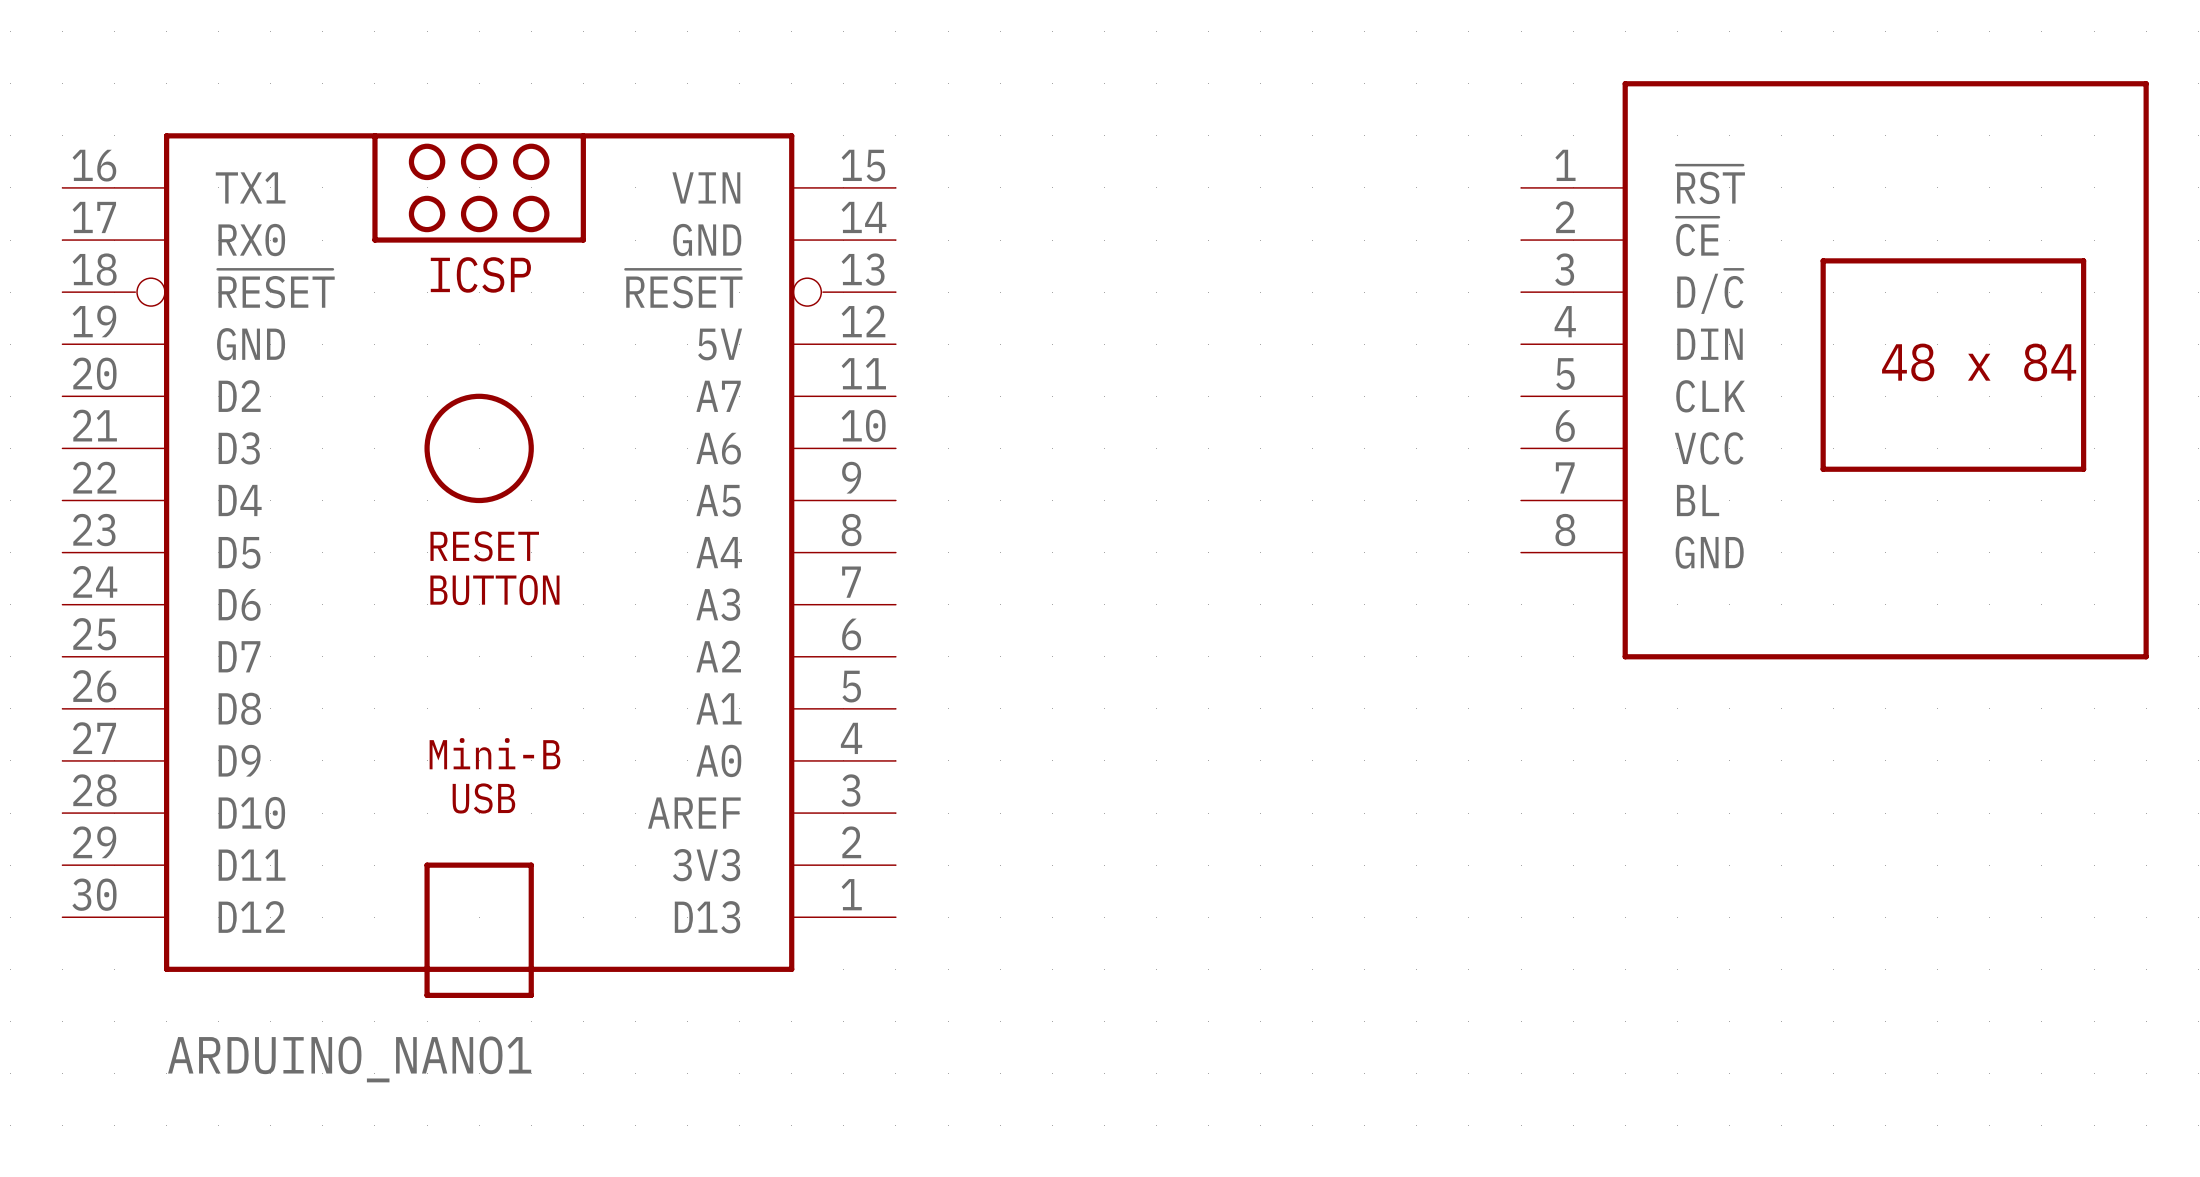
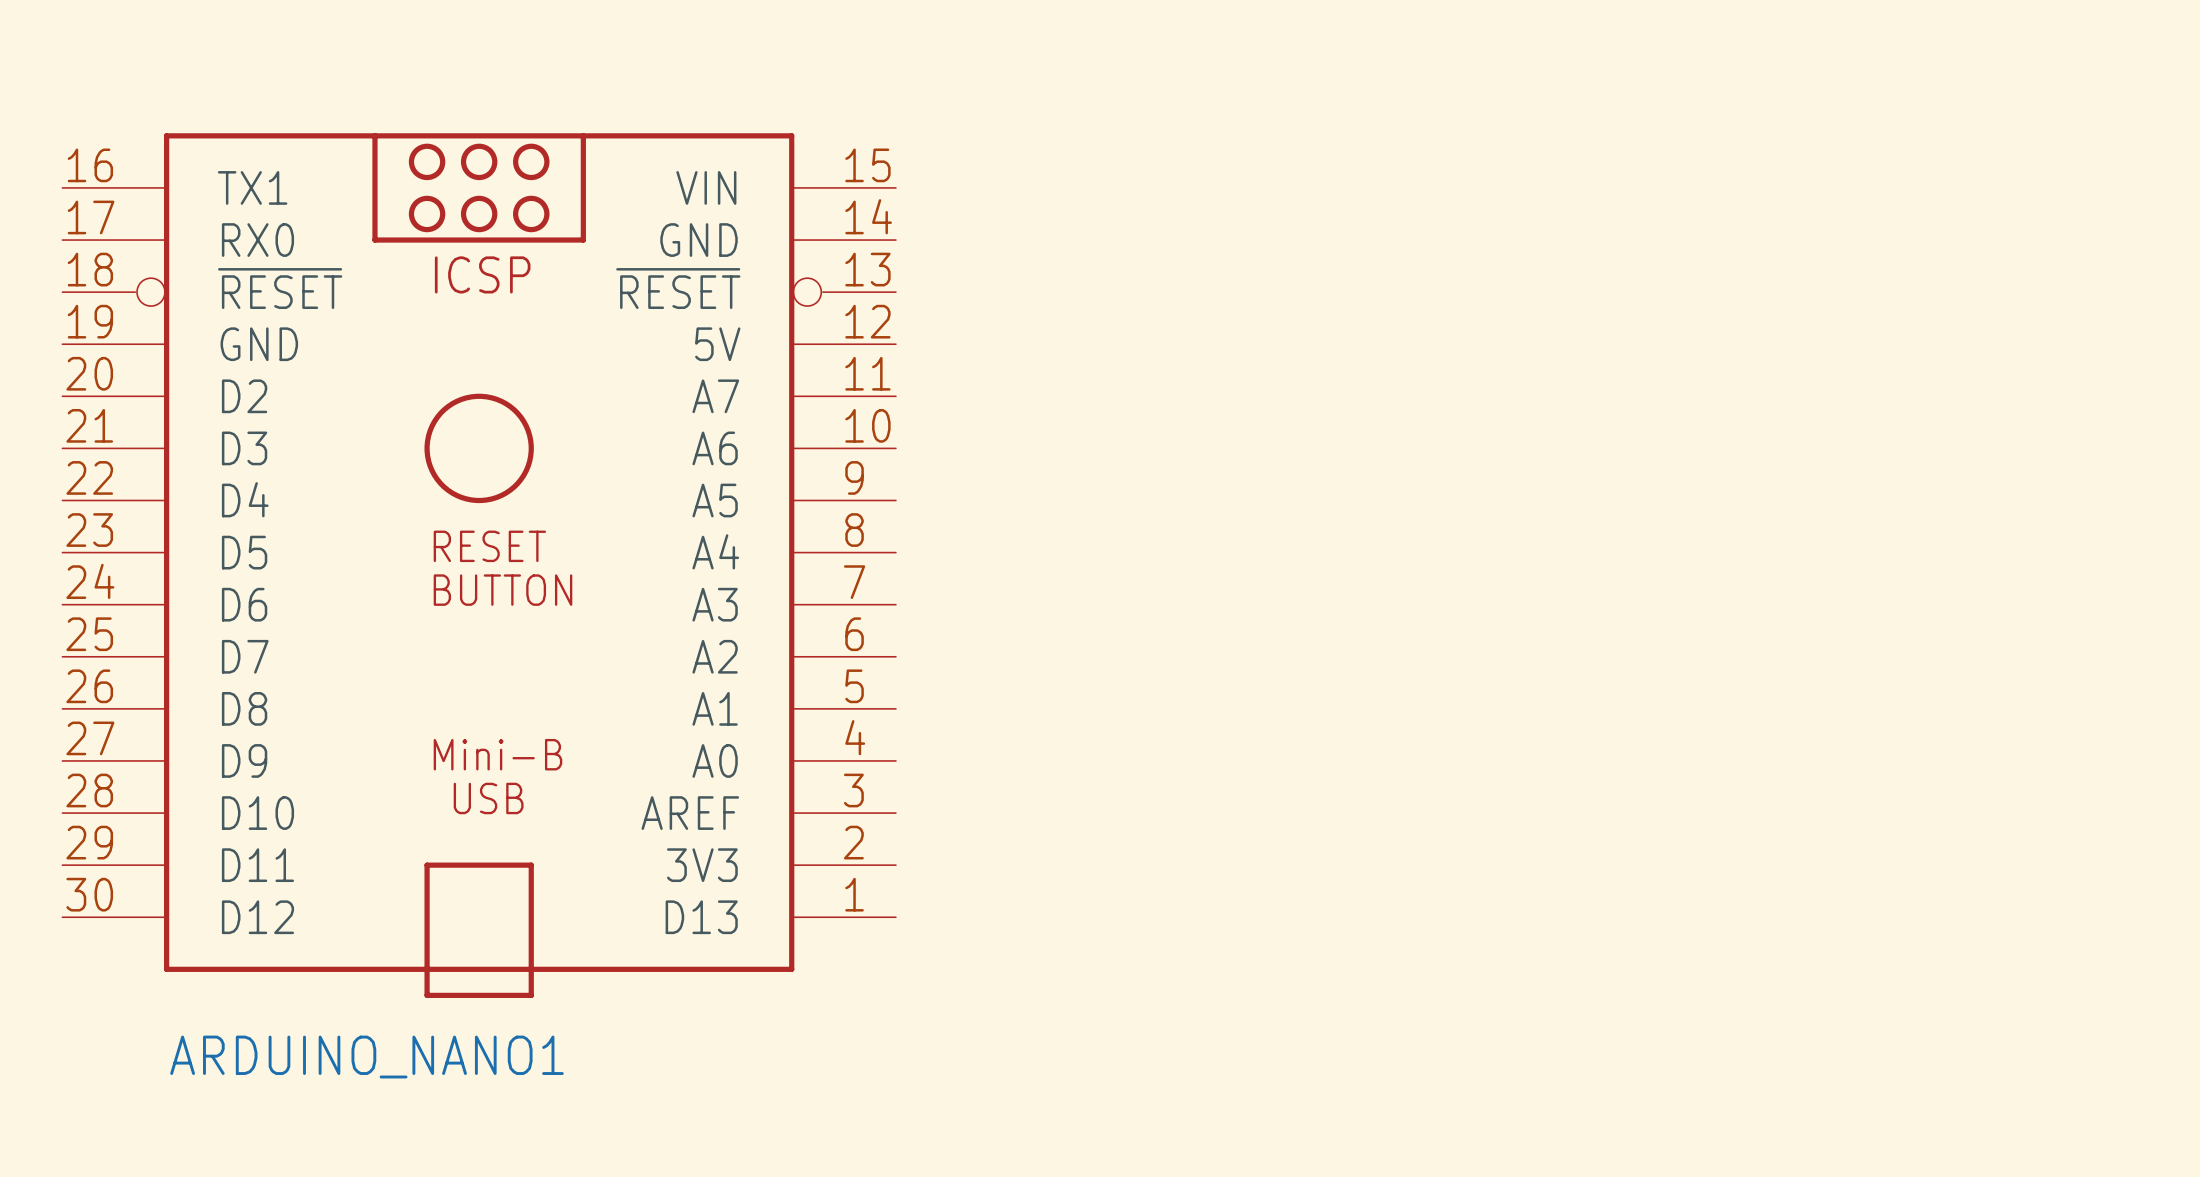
part: (1834, 370) -> none

